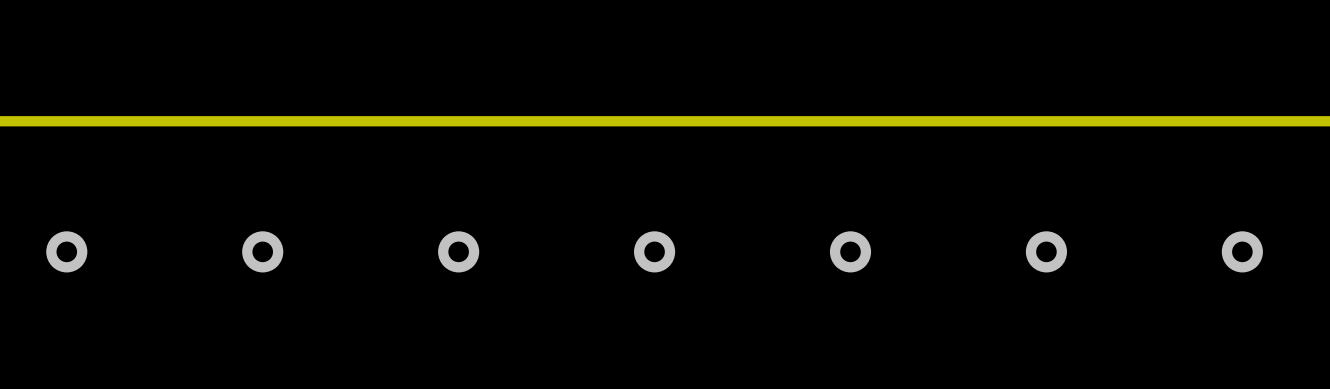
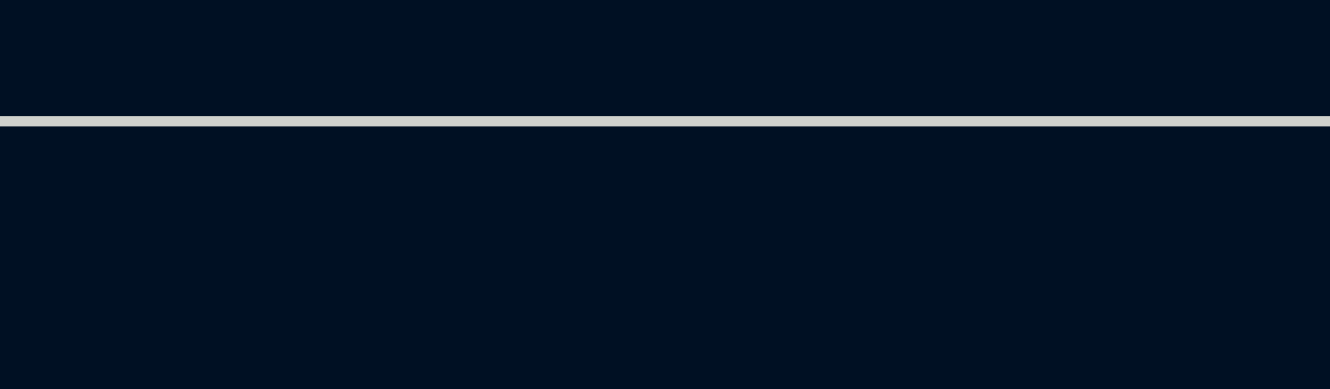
via: (66, 251) -> none
via: (262, 251) -> none
via: (458, 251) -> none
via: (654, 251) -> none
via: (850, 251) -> none
via: (1046, 251) -> none
via: (1242, 251) -> none

